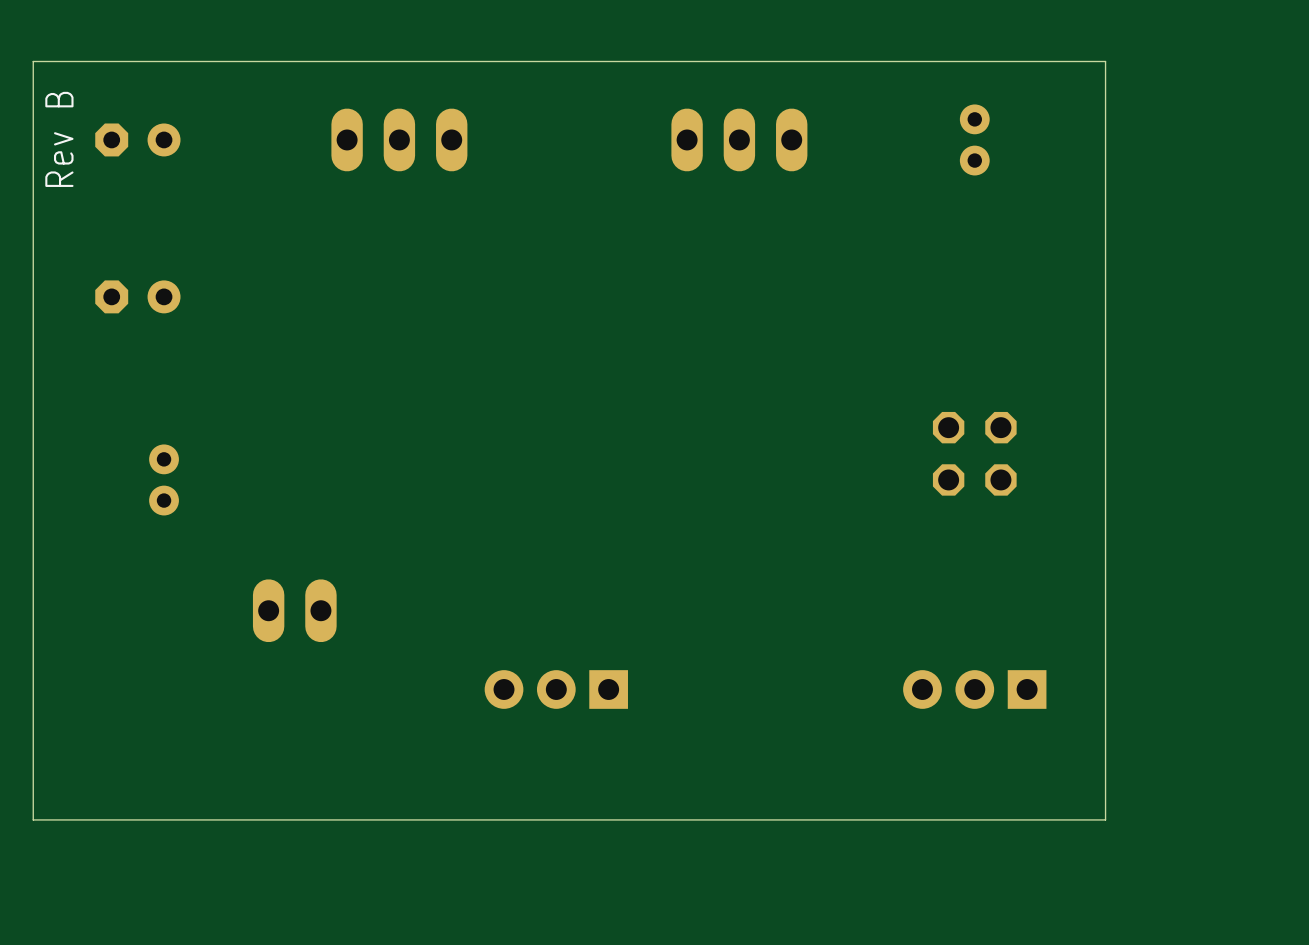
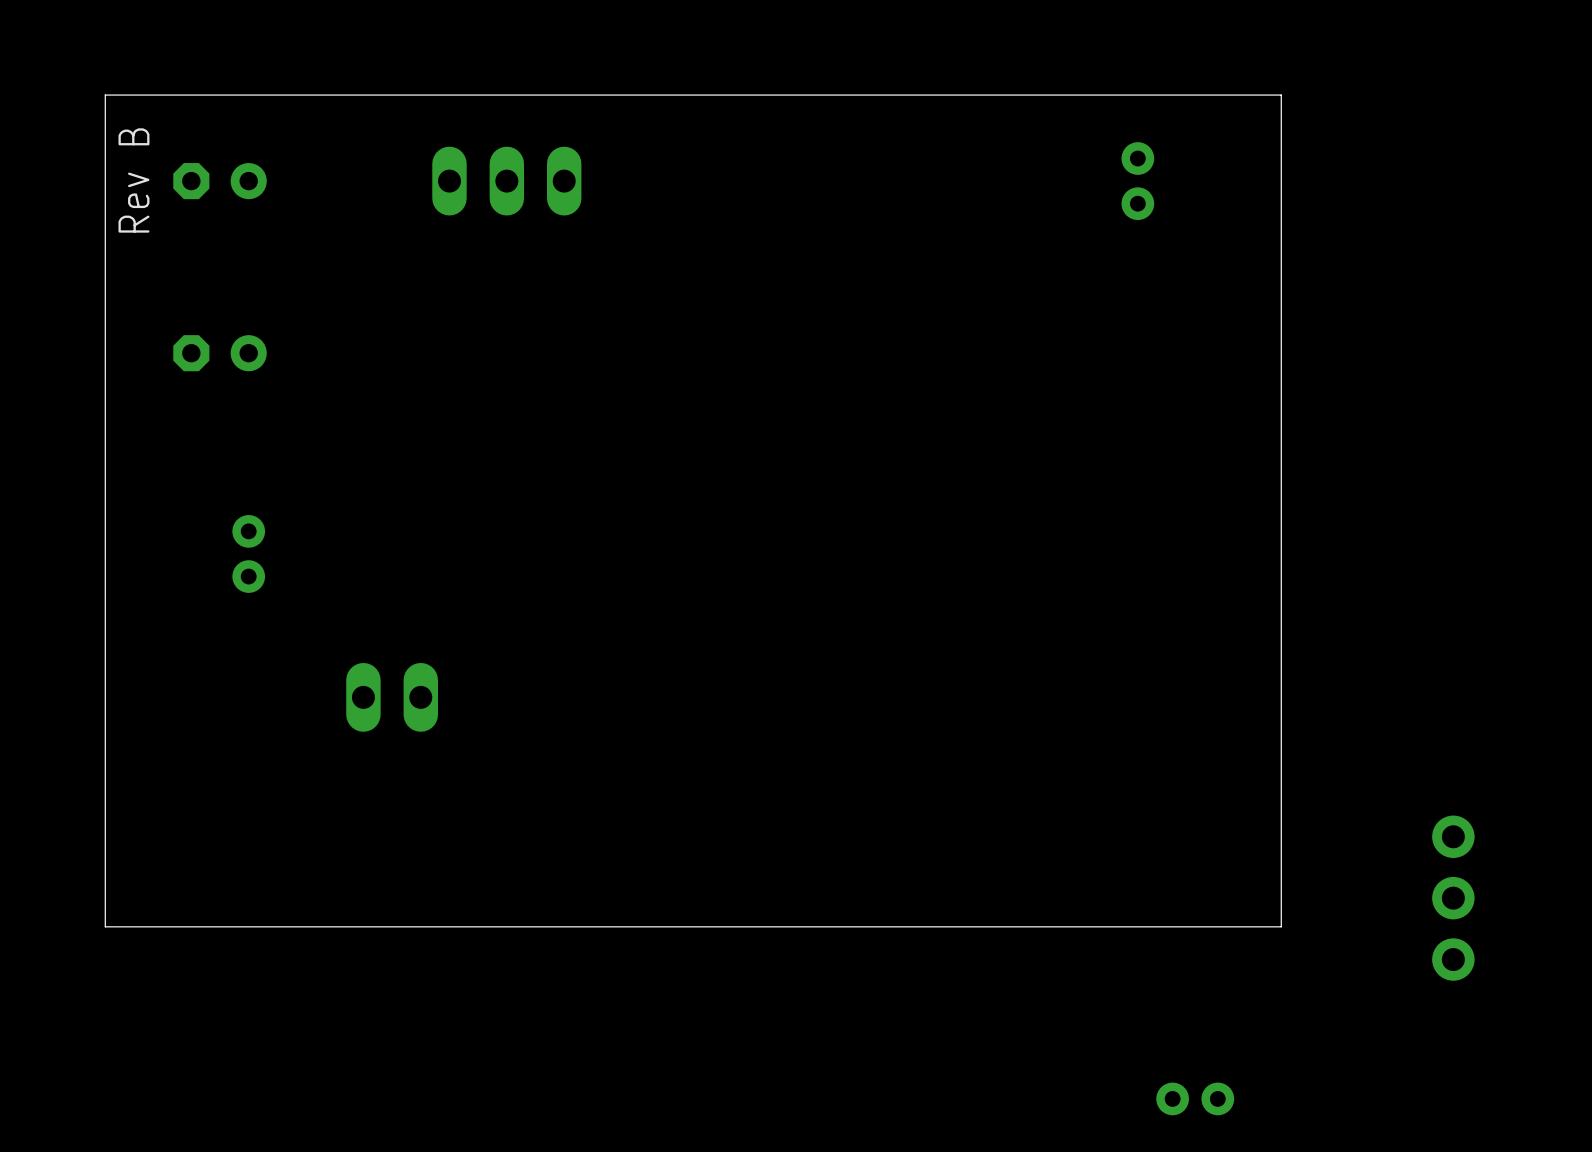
part: (739, 139) -> none
part: (974, 453) -> none
part: (556, 689) -> none
part: (974, 689) -> none
part: none -> (1453, 898)

